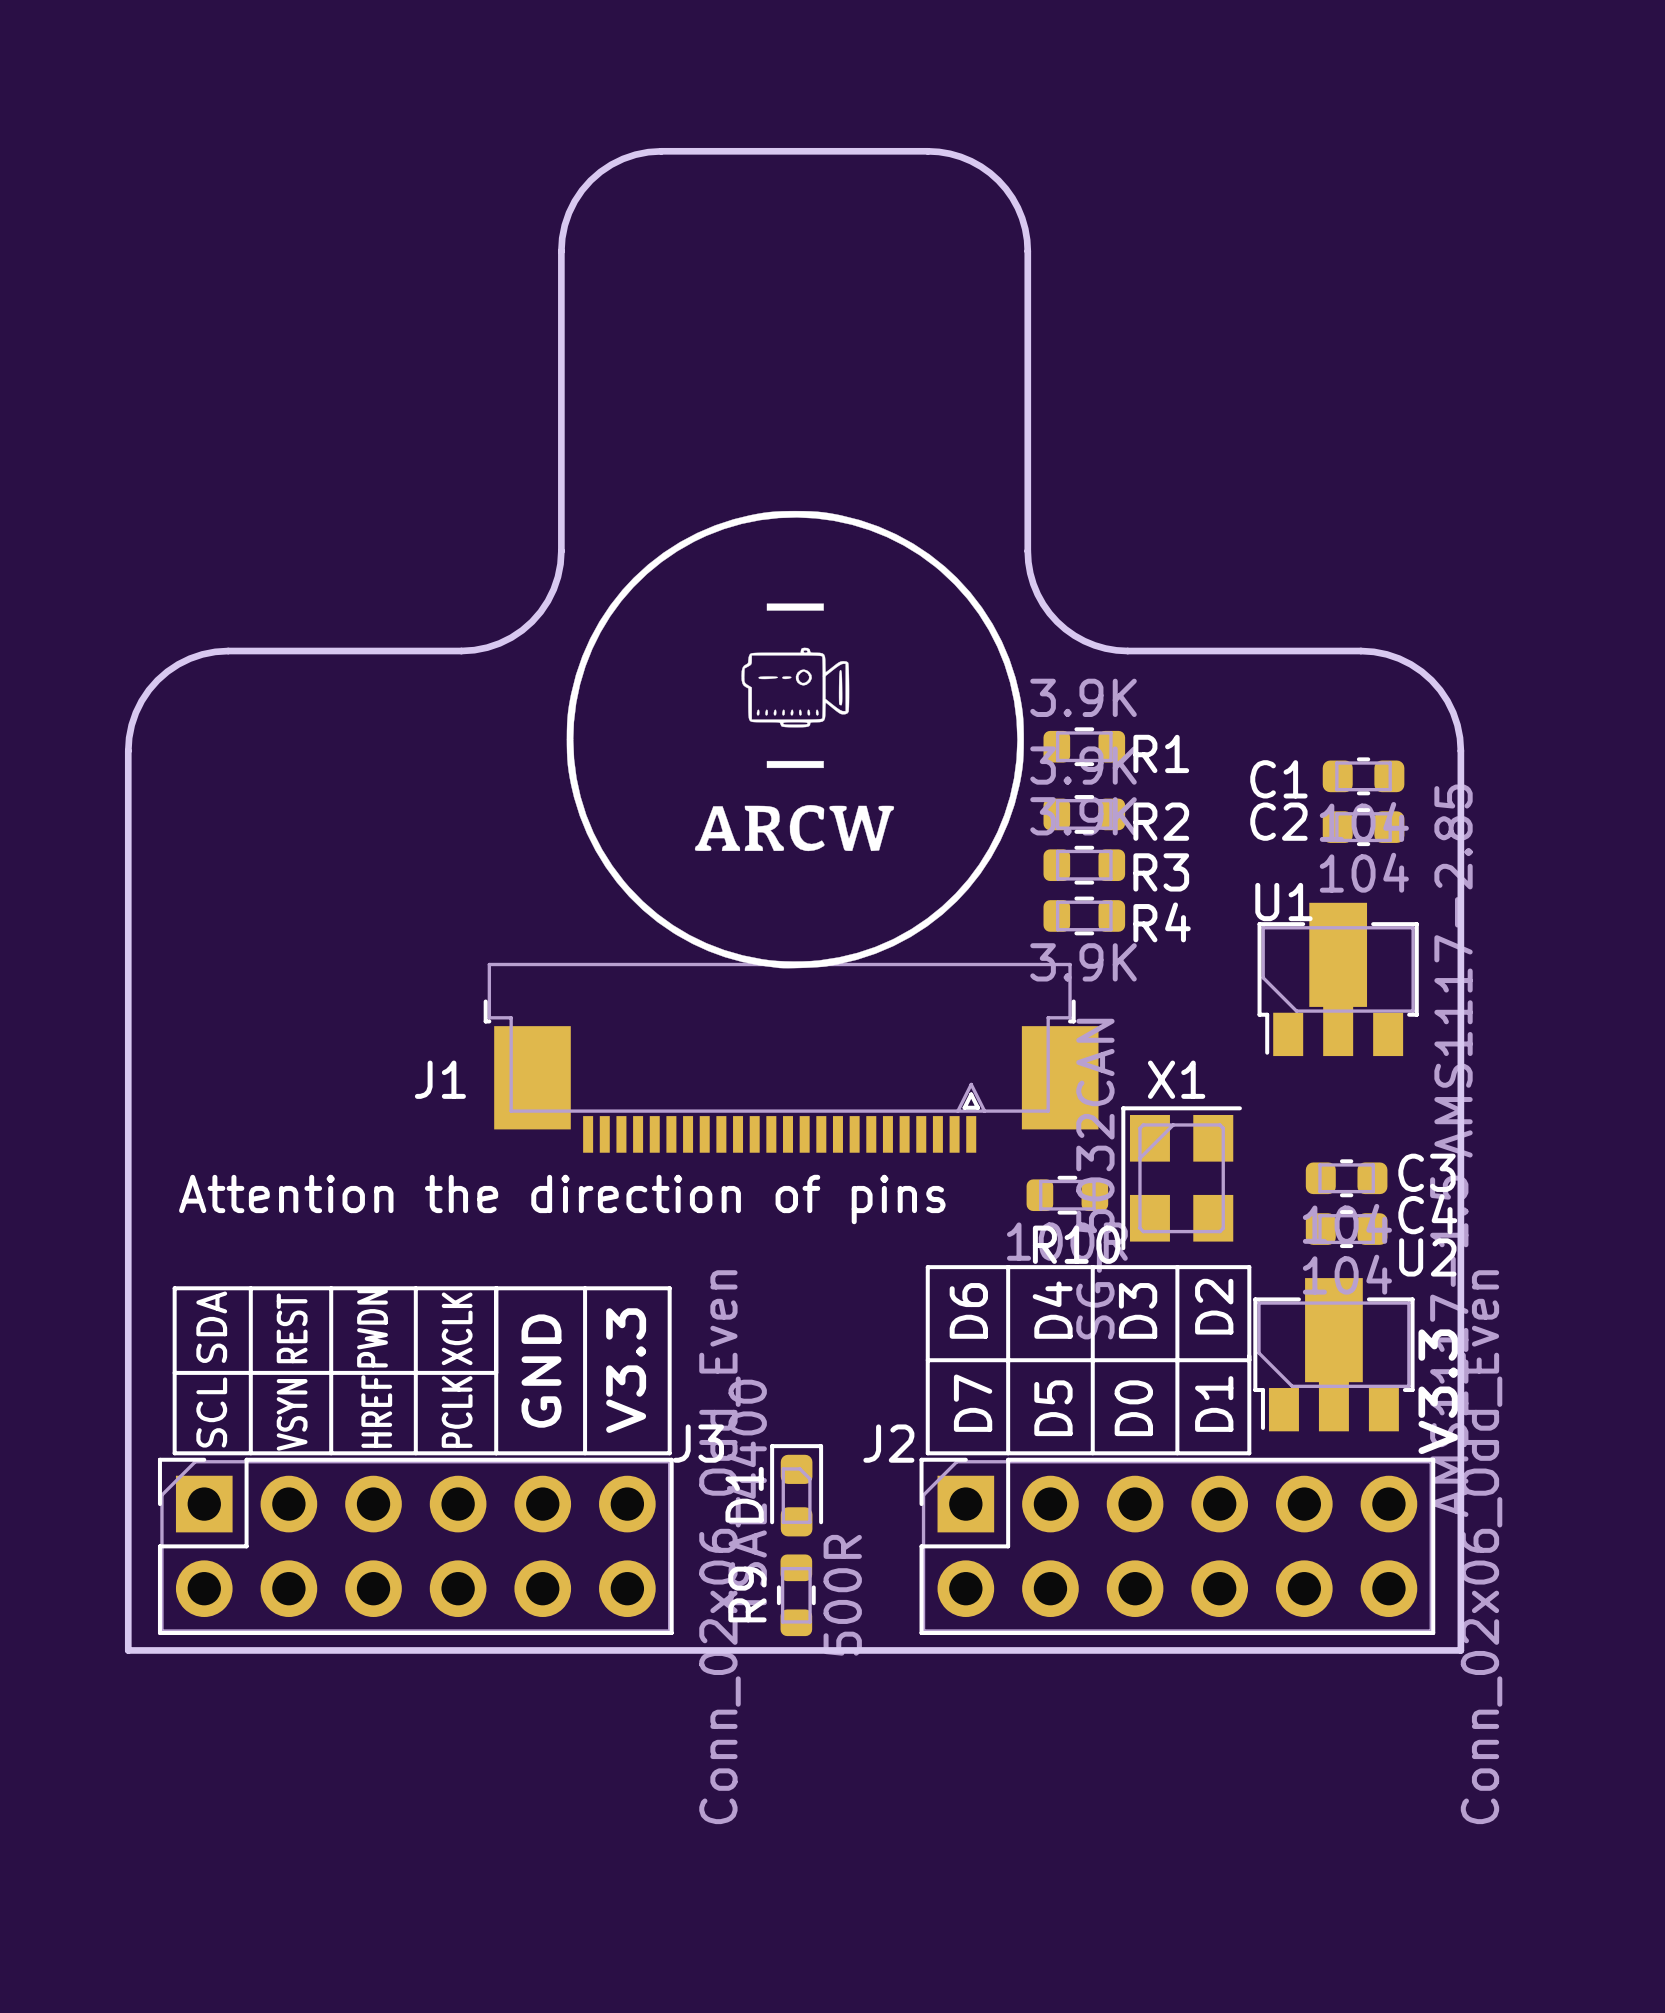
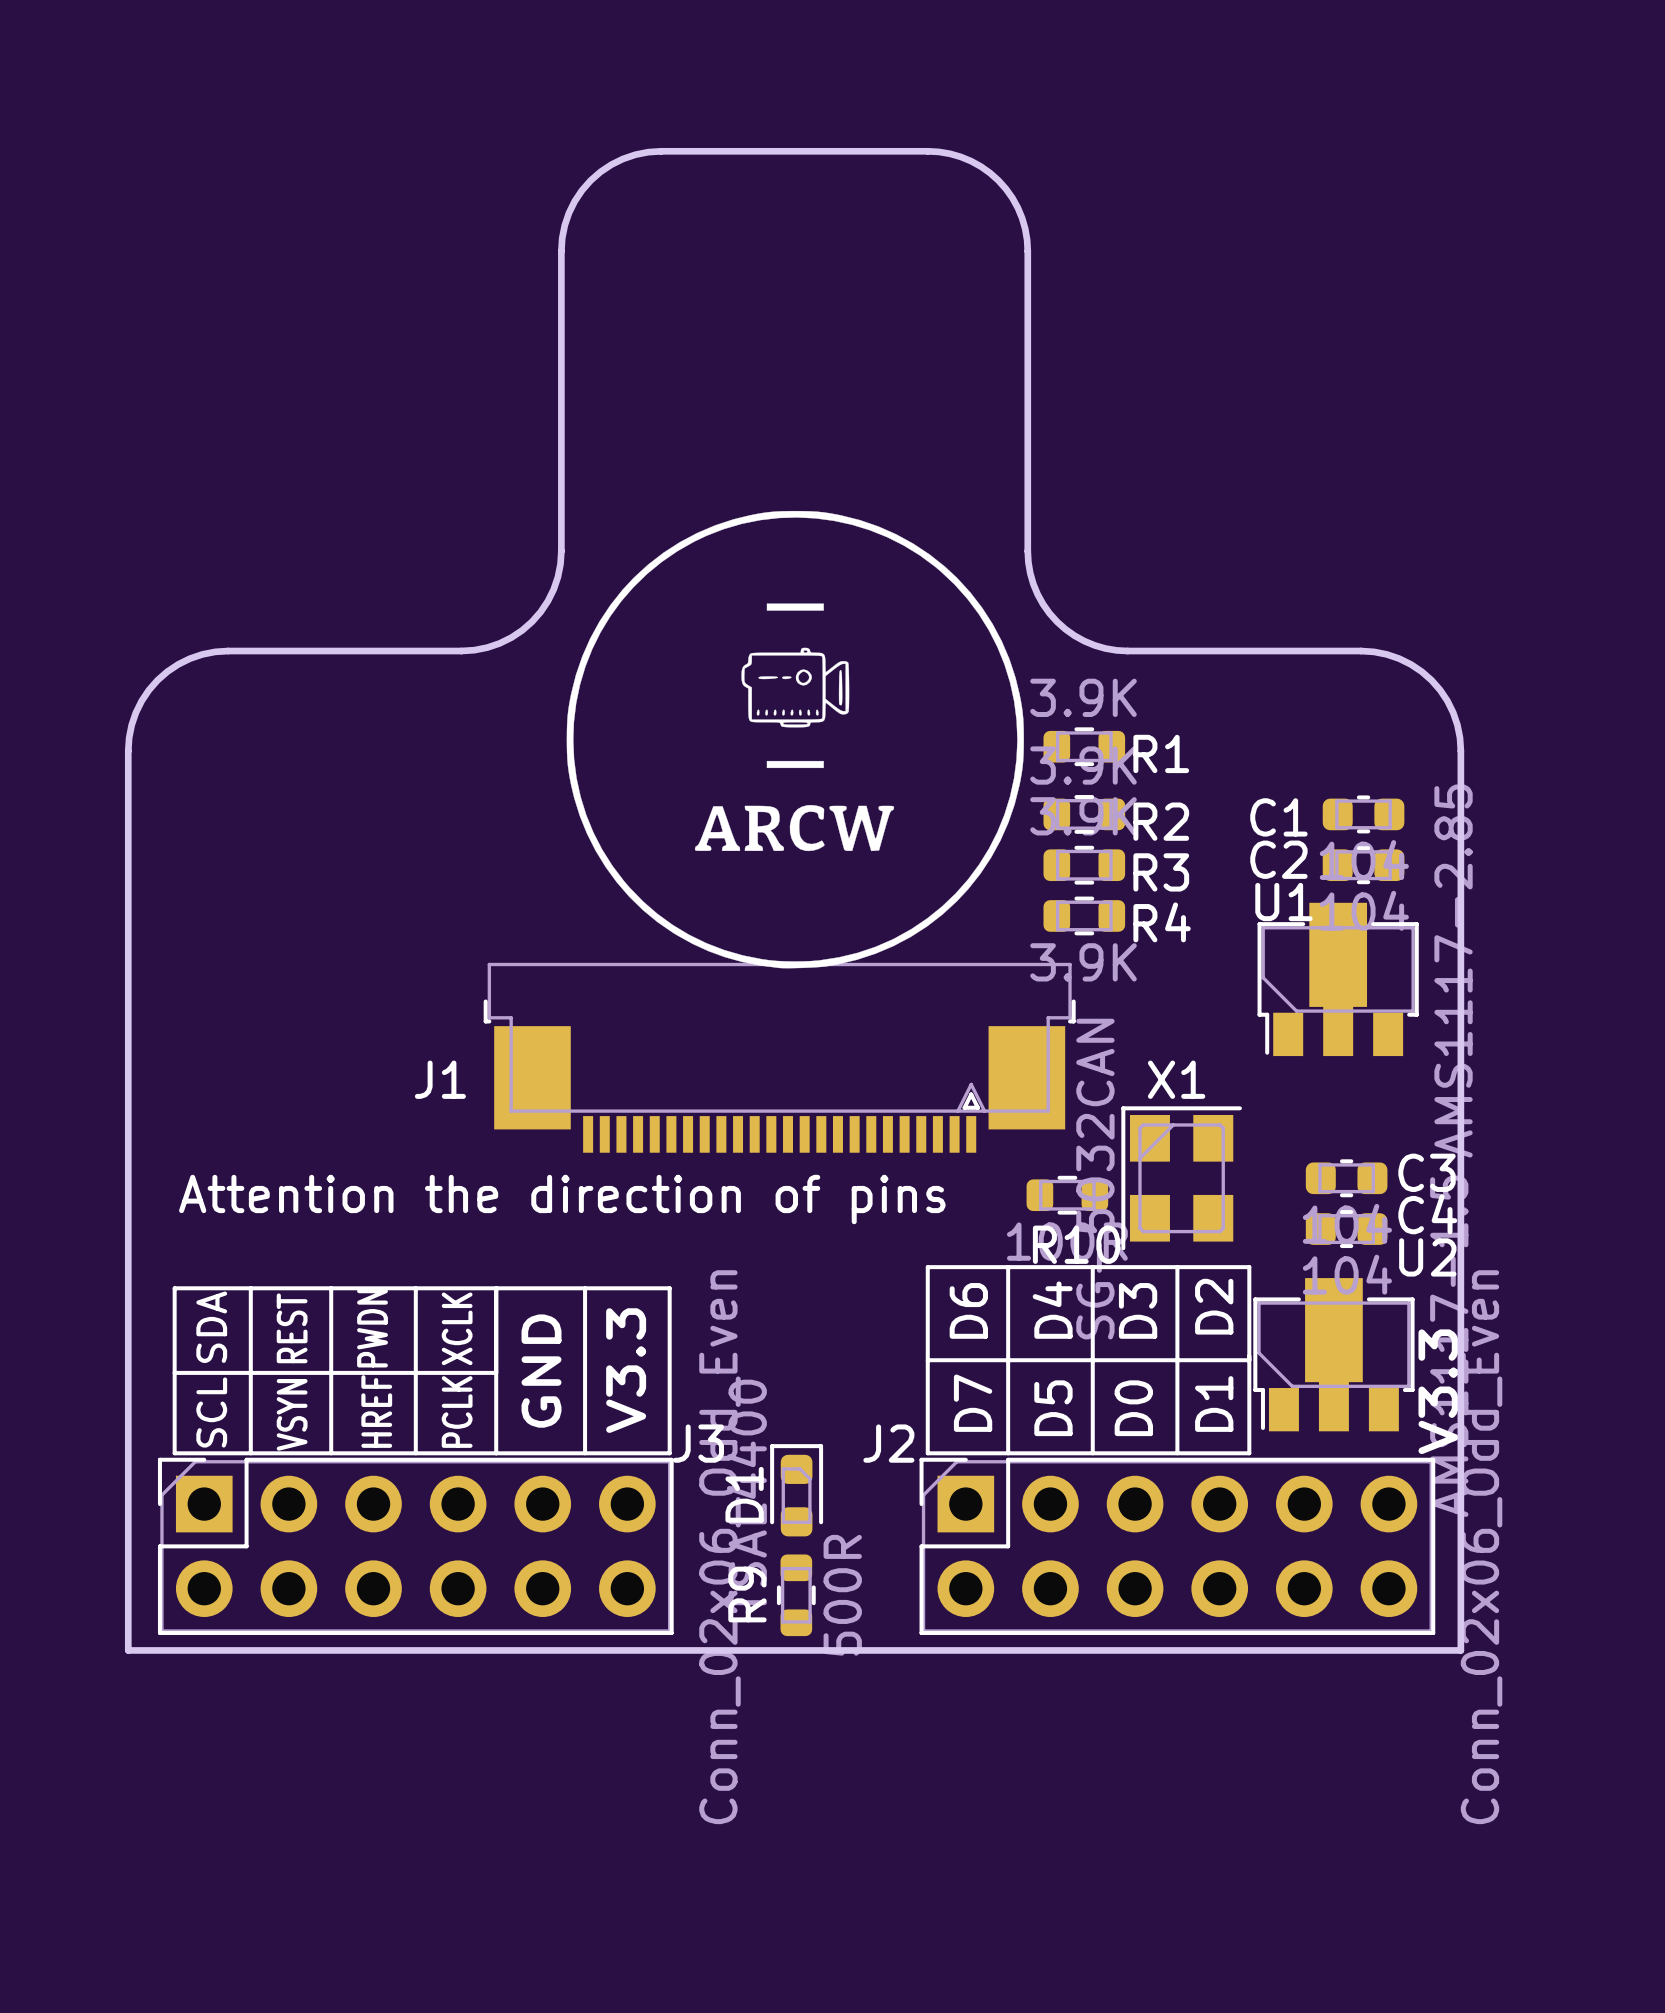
C1 position: (1363, 776) -> (1363, 814)
C2 position: (1363, 827) -> (1363, 865)
J1 footprint: [483, 962, 1099, 1153] -> [483, 962, 1076, 1153]

